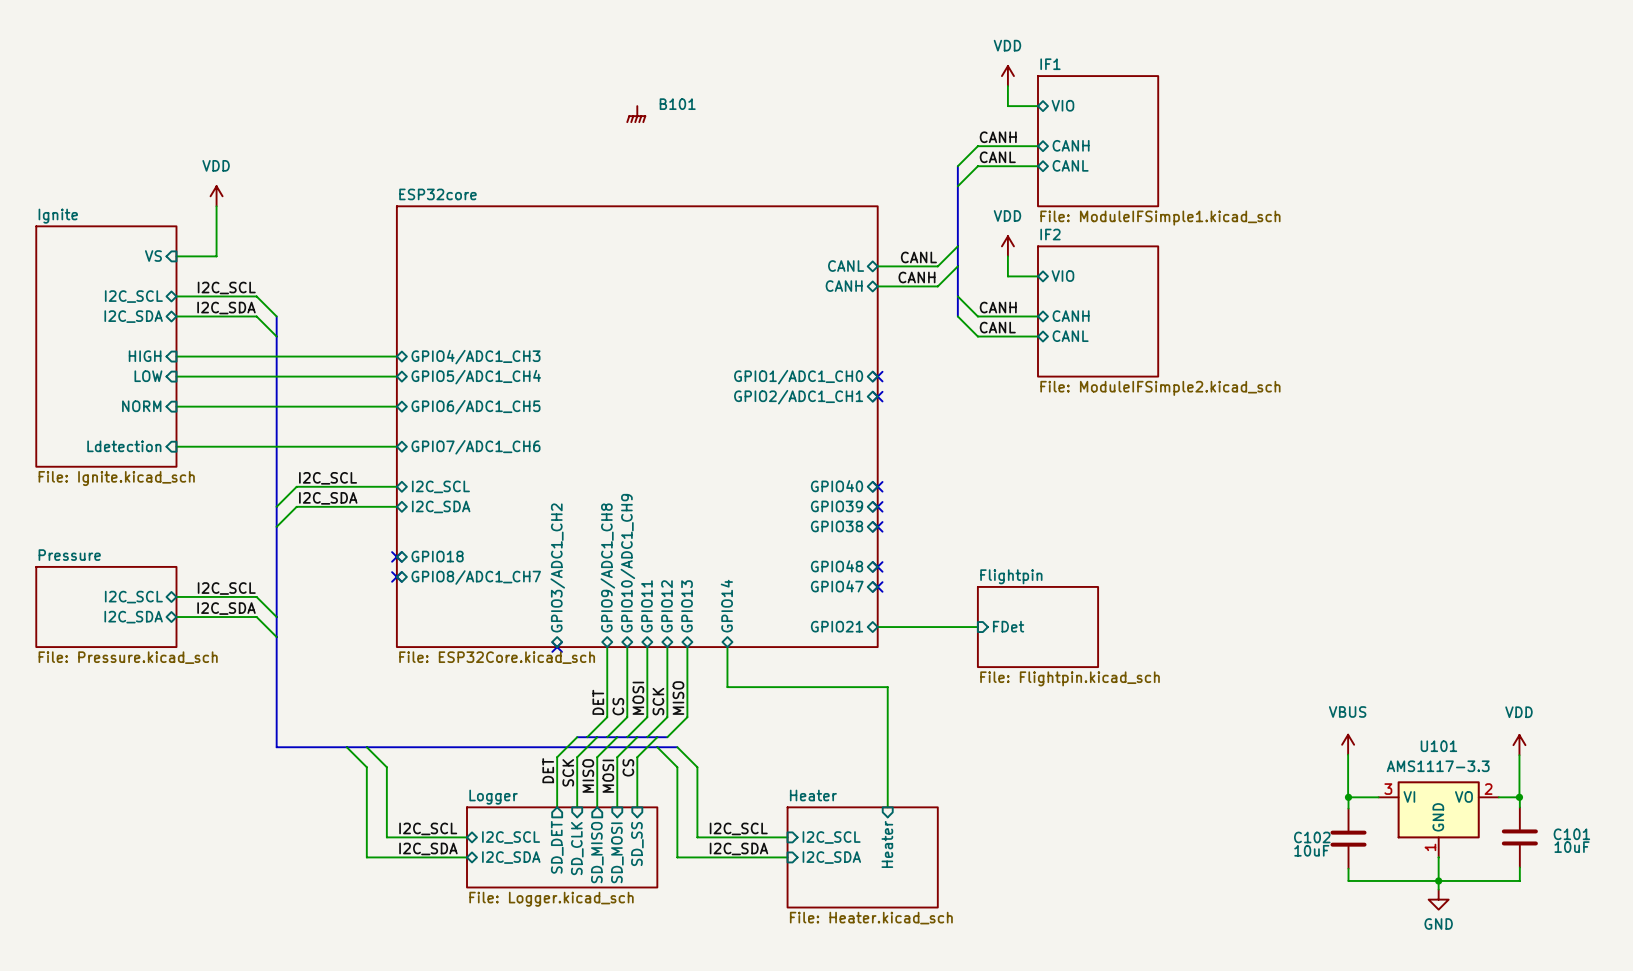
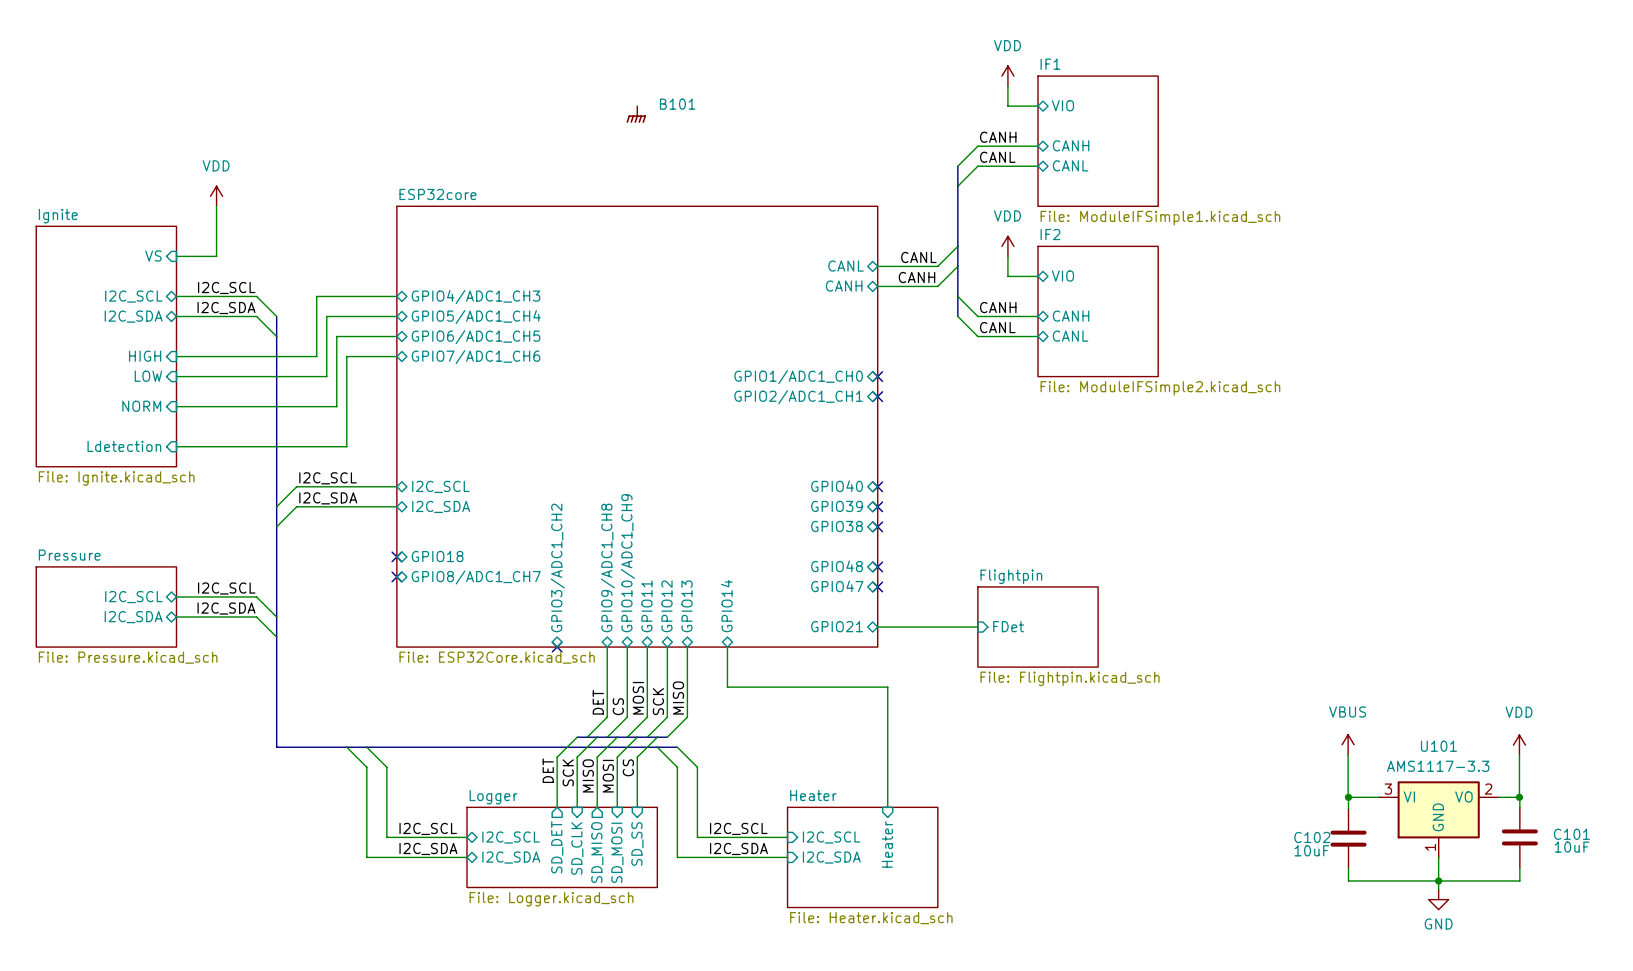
sheet pin: none -> GPIO4/ADC1_CH3 (475, 297)
wire: (316, 356) (346, 356) -> (316, 356) (316, 296) (396, 296)
sheet pin: GPIO4/ADC1_CH3 (475, 357) -> GPIO7/ADC1_CH6 (475, 357)
wire: (326, 376) (396, 376) -> (326, 376) (326, 316) (396, 316)
sheet pin position: GPIO5/ADC1_CH4 (476, 377) -> GPIO5/ADC1_CH4 (476, 317)
wire: (336, 406) (396, 406) -> (336, 406) (336, 336) (396, 336)
sheet pin position: GPIO6/ADC1_CH5 (475, 407) -> GPIO6/ADC1_CH5 (475, 337)
wire: (346, 446) (396, 446) -> (346, 446) (346, 356)
sheet pin: GPIO7/ADC1_CH6 (475, 447) -> none

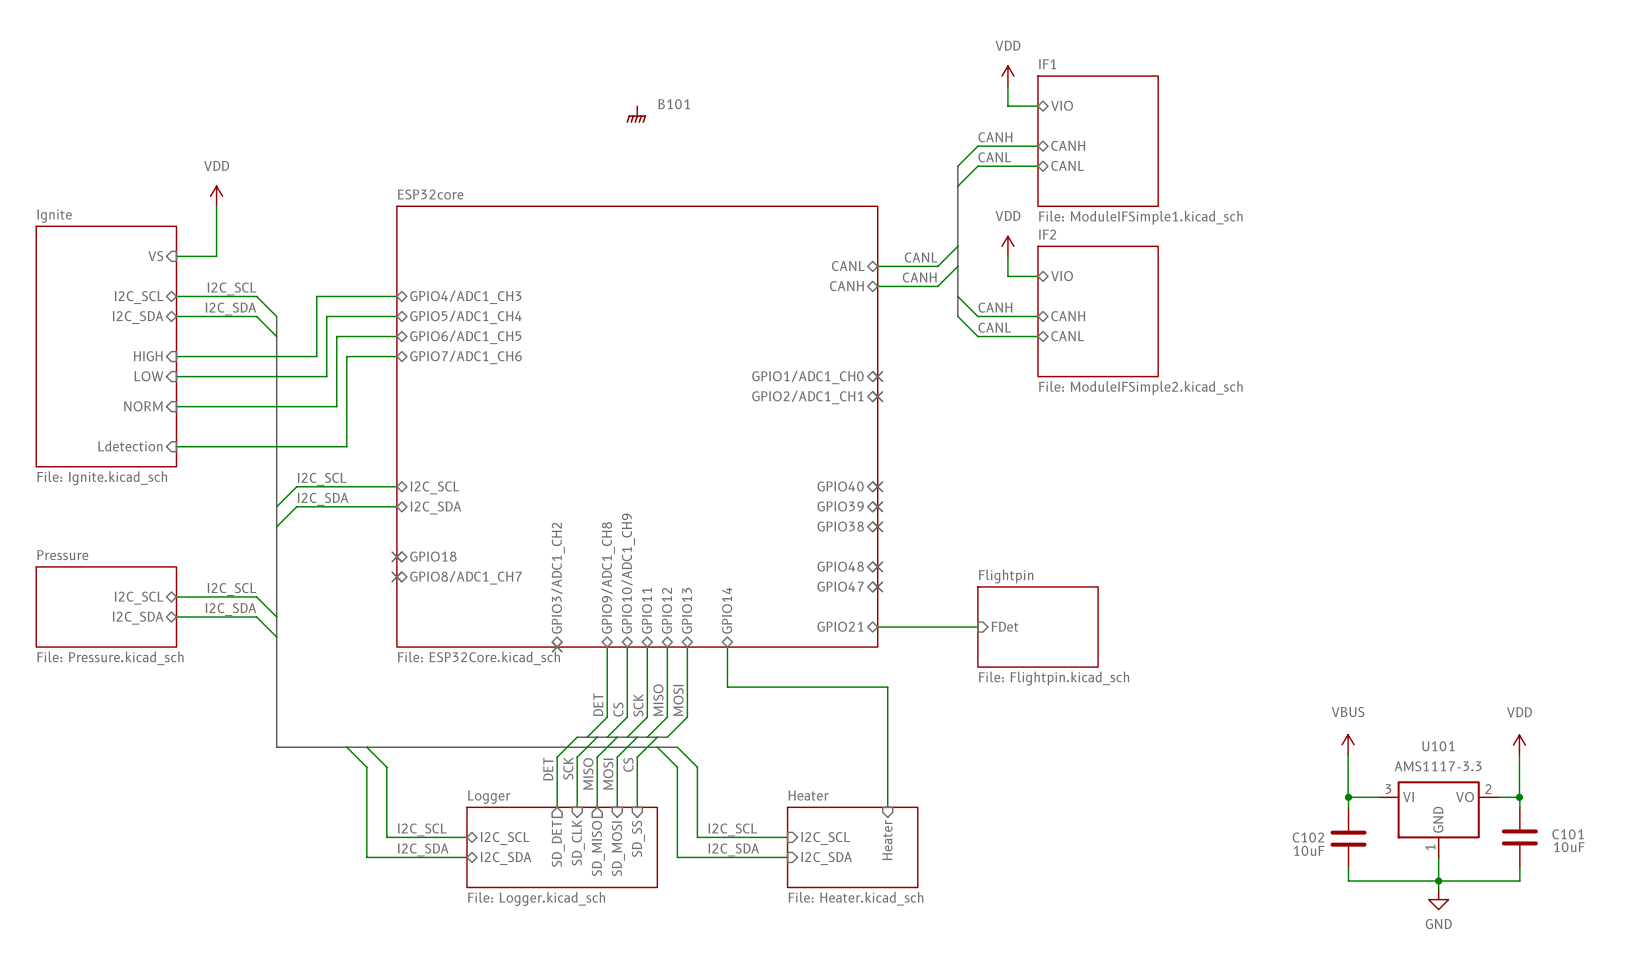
label: MOSI (638, 698) -> SCK (638, 705)
label: MISO (678, 698) -> MOSI (678, 700)
label: SCK (658, 701) -> MISO (658, 700)
sheet Heater: none -> File: Heater.kicad_sch (852, 847)
sheet Heater: File: Heater.kicad_sch (862, 857) -> none

